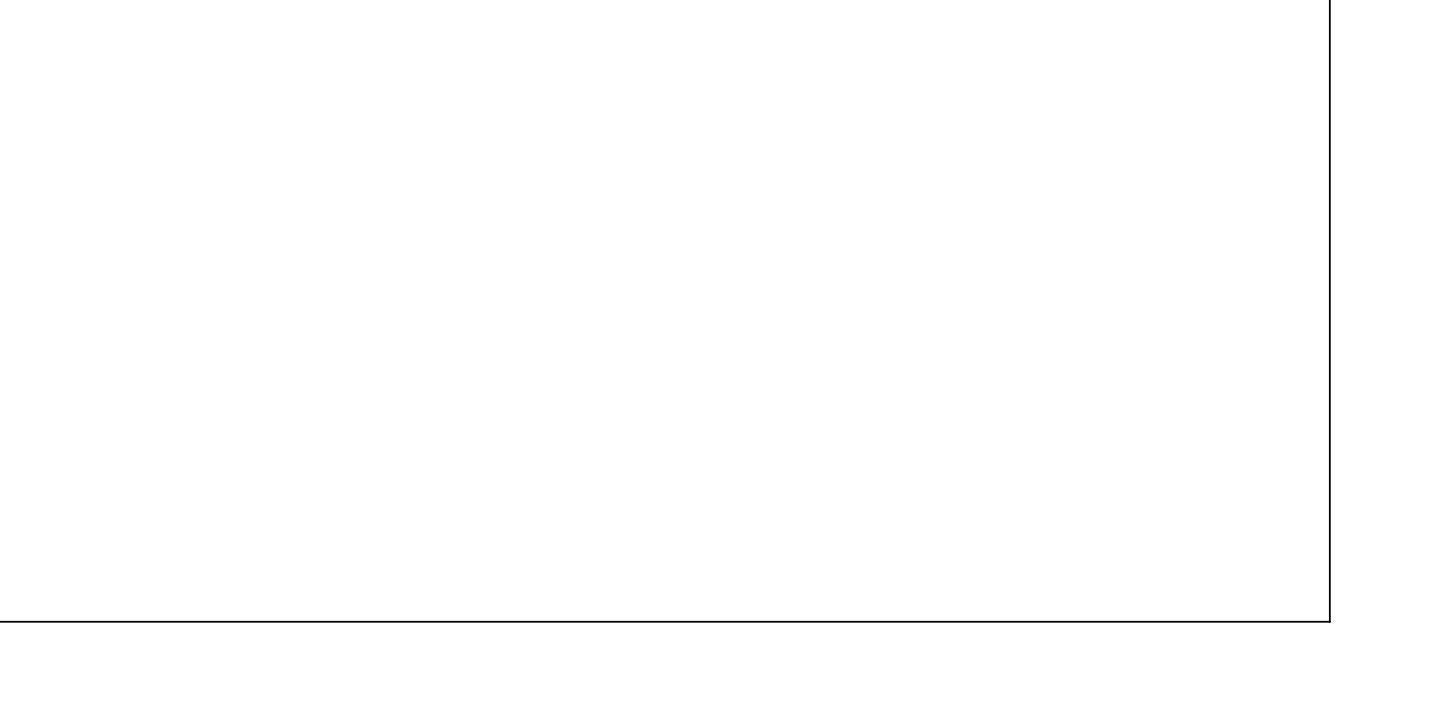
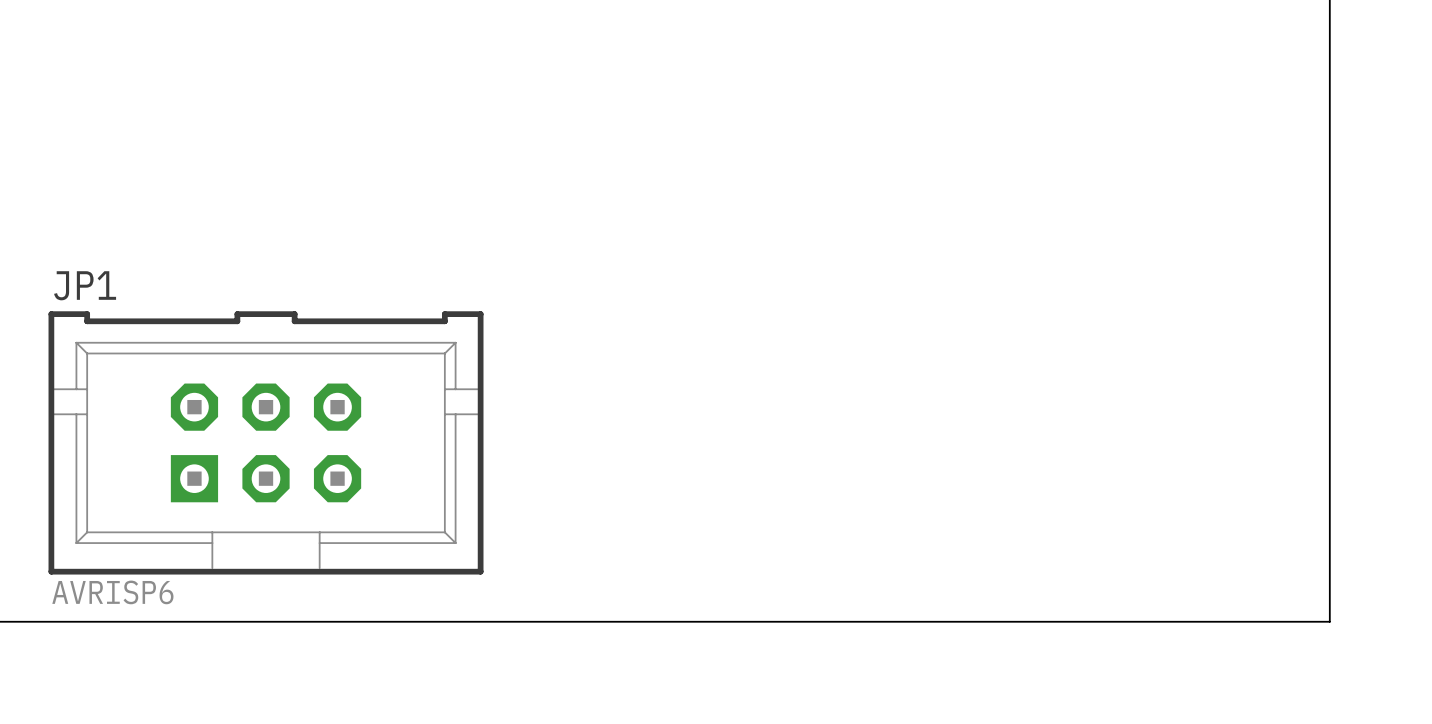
JP1: none -> AVRISP6 (266, 442)

